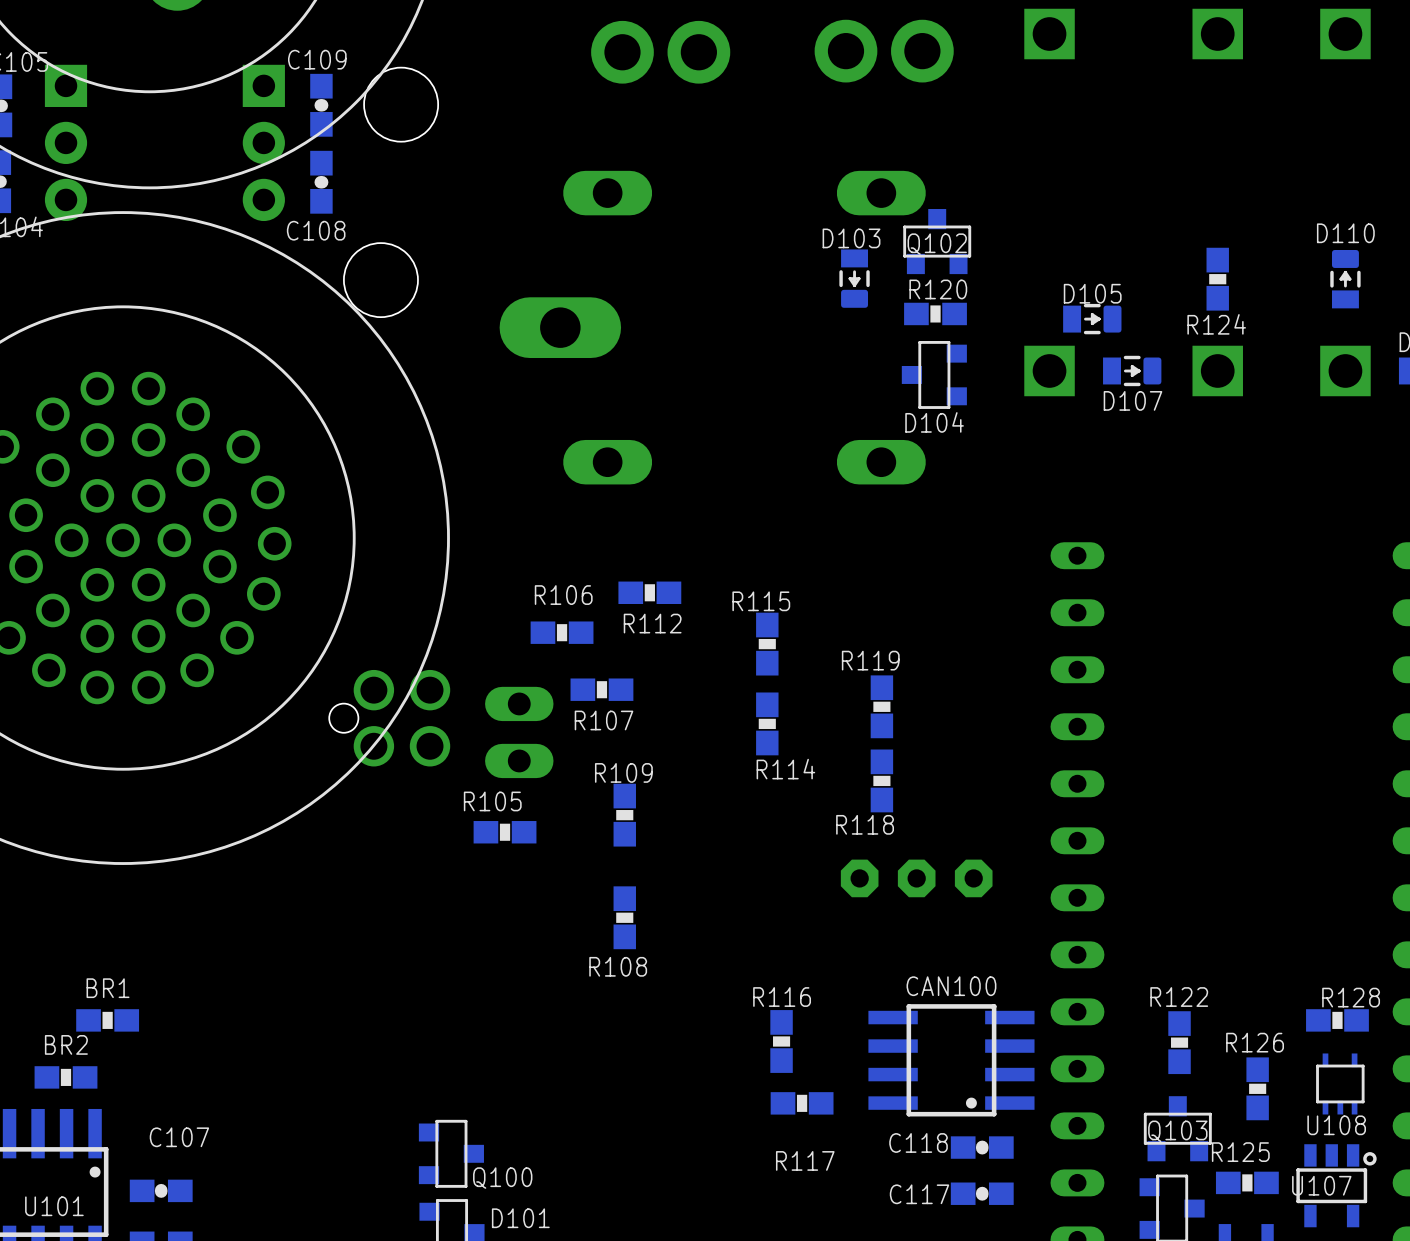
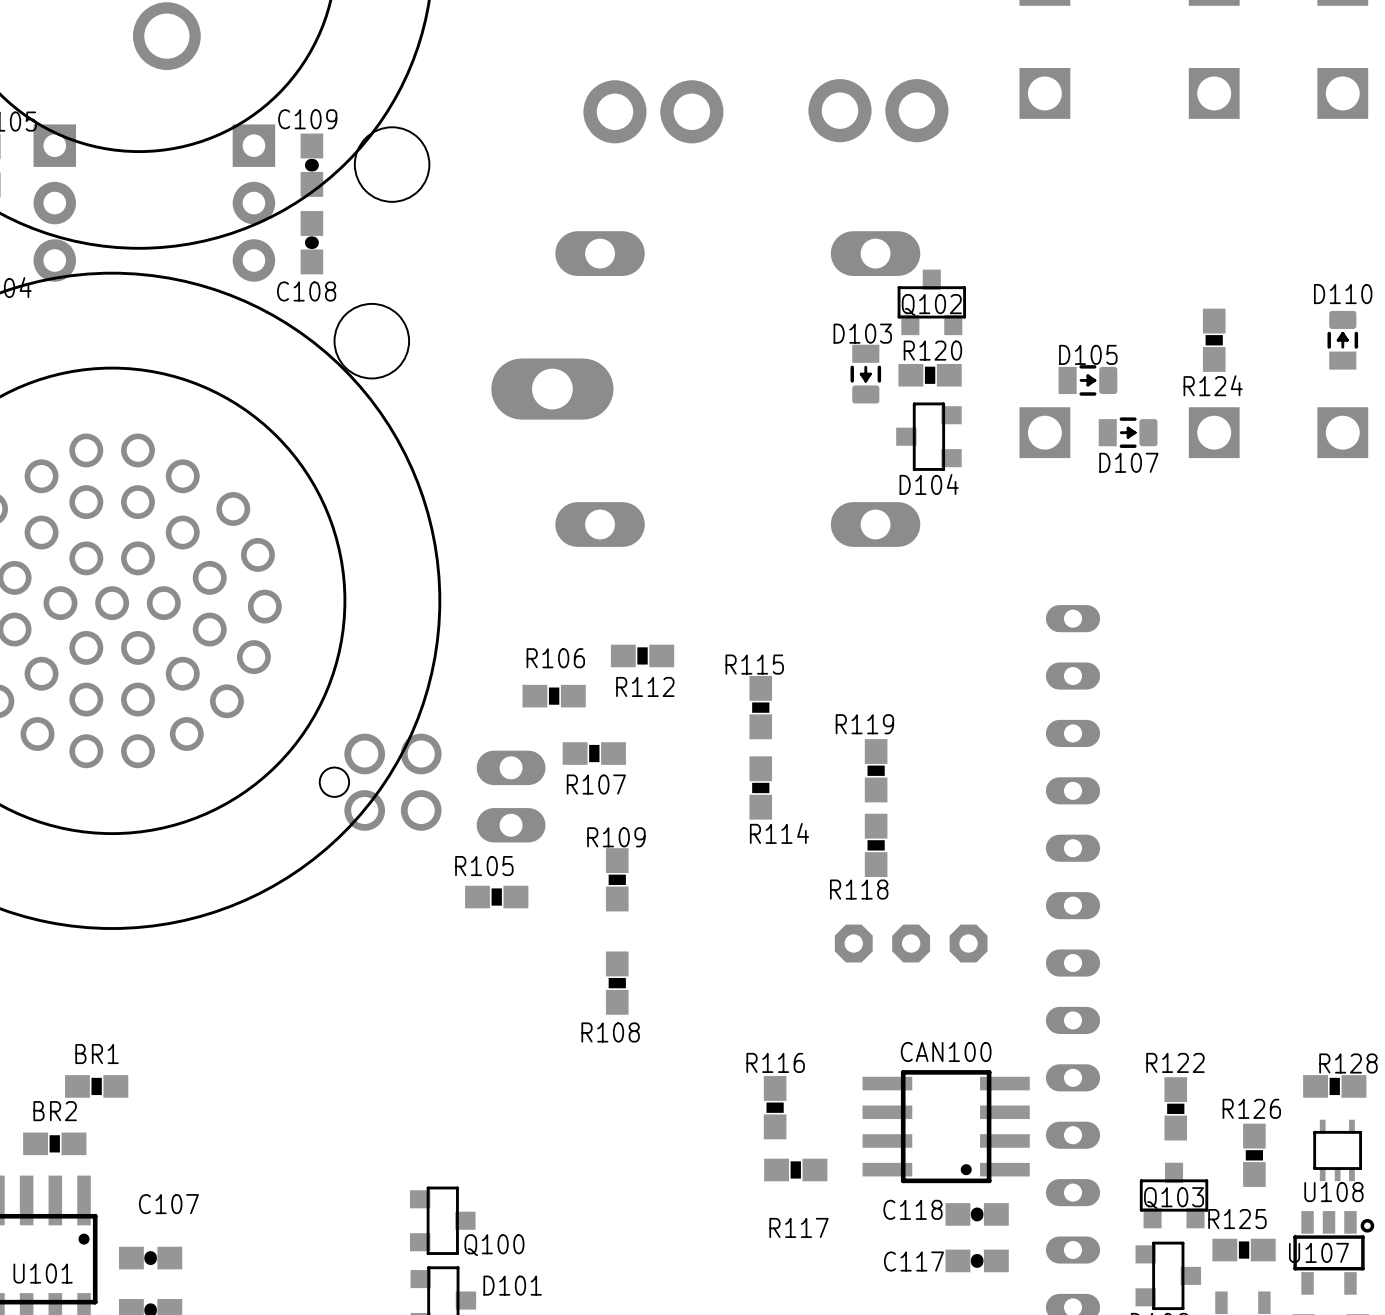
D103 position: (854, 278) -> (865, 374)

